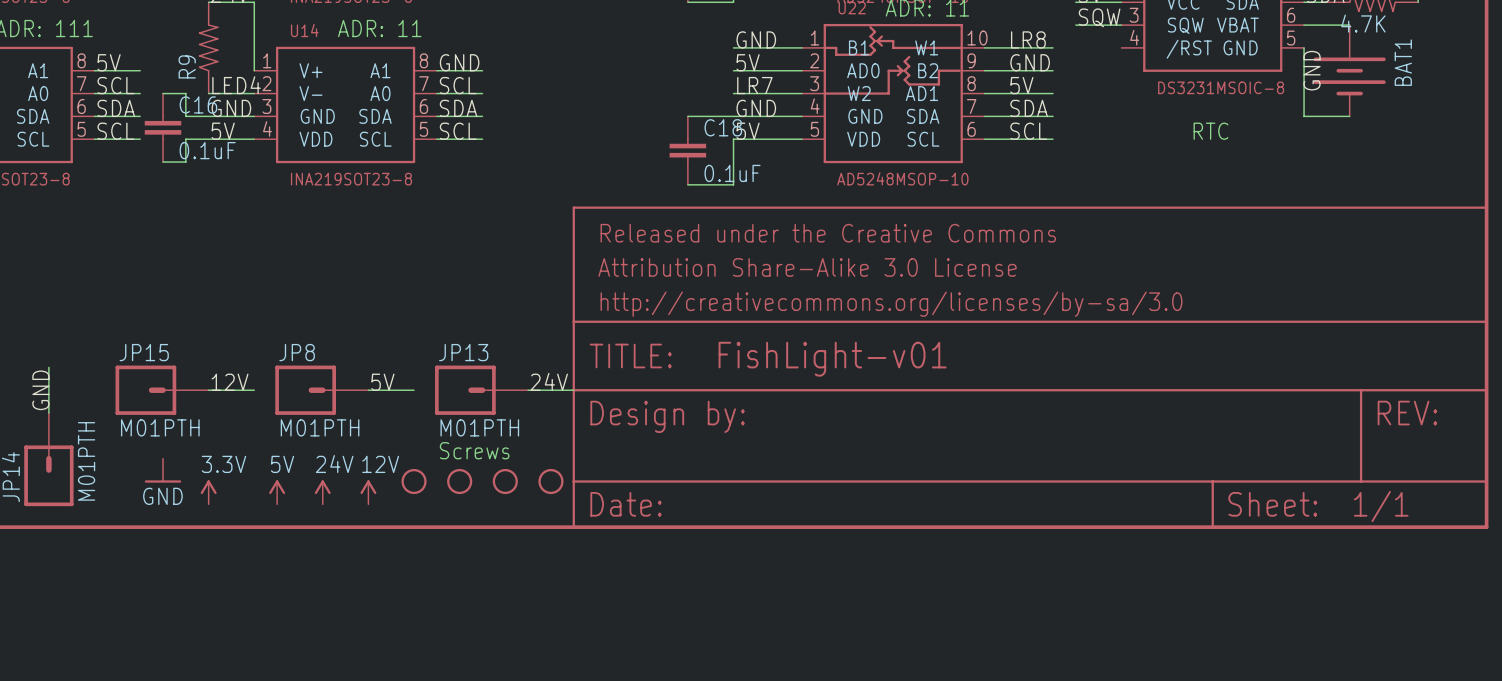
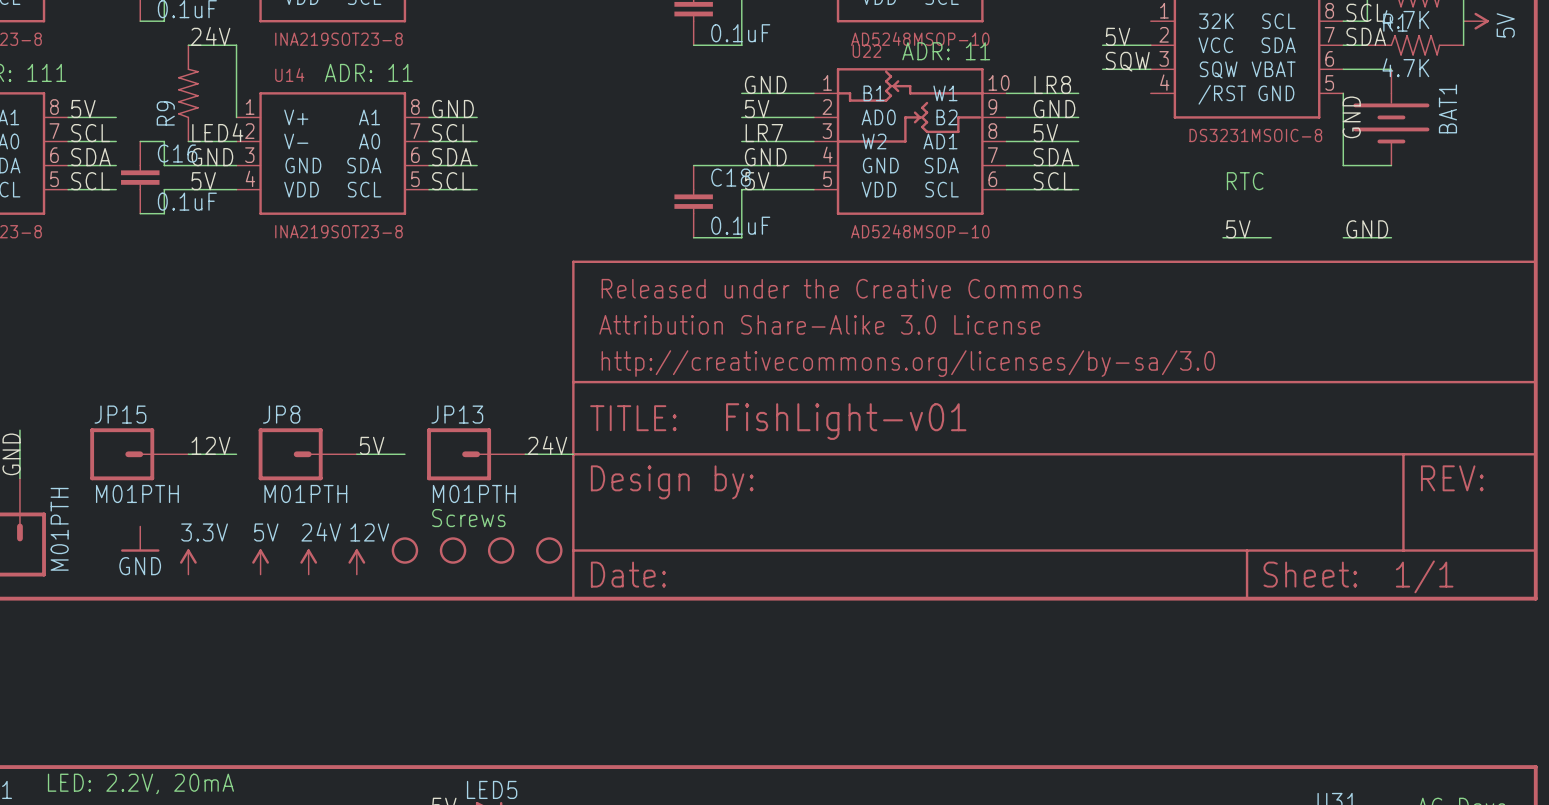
label: none -> 5V (1238, 229)
label: none -> GND (1367, 229)
wire: none -> (1222, 237) (1271, 237)
wire: none -> (1343, 237) (1391, 237)

